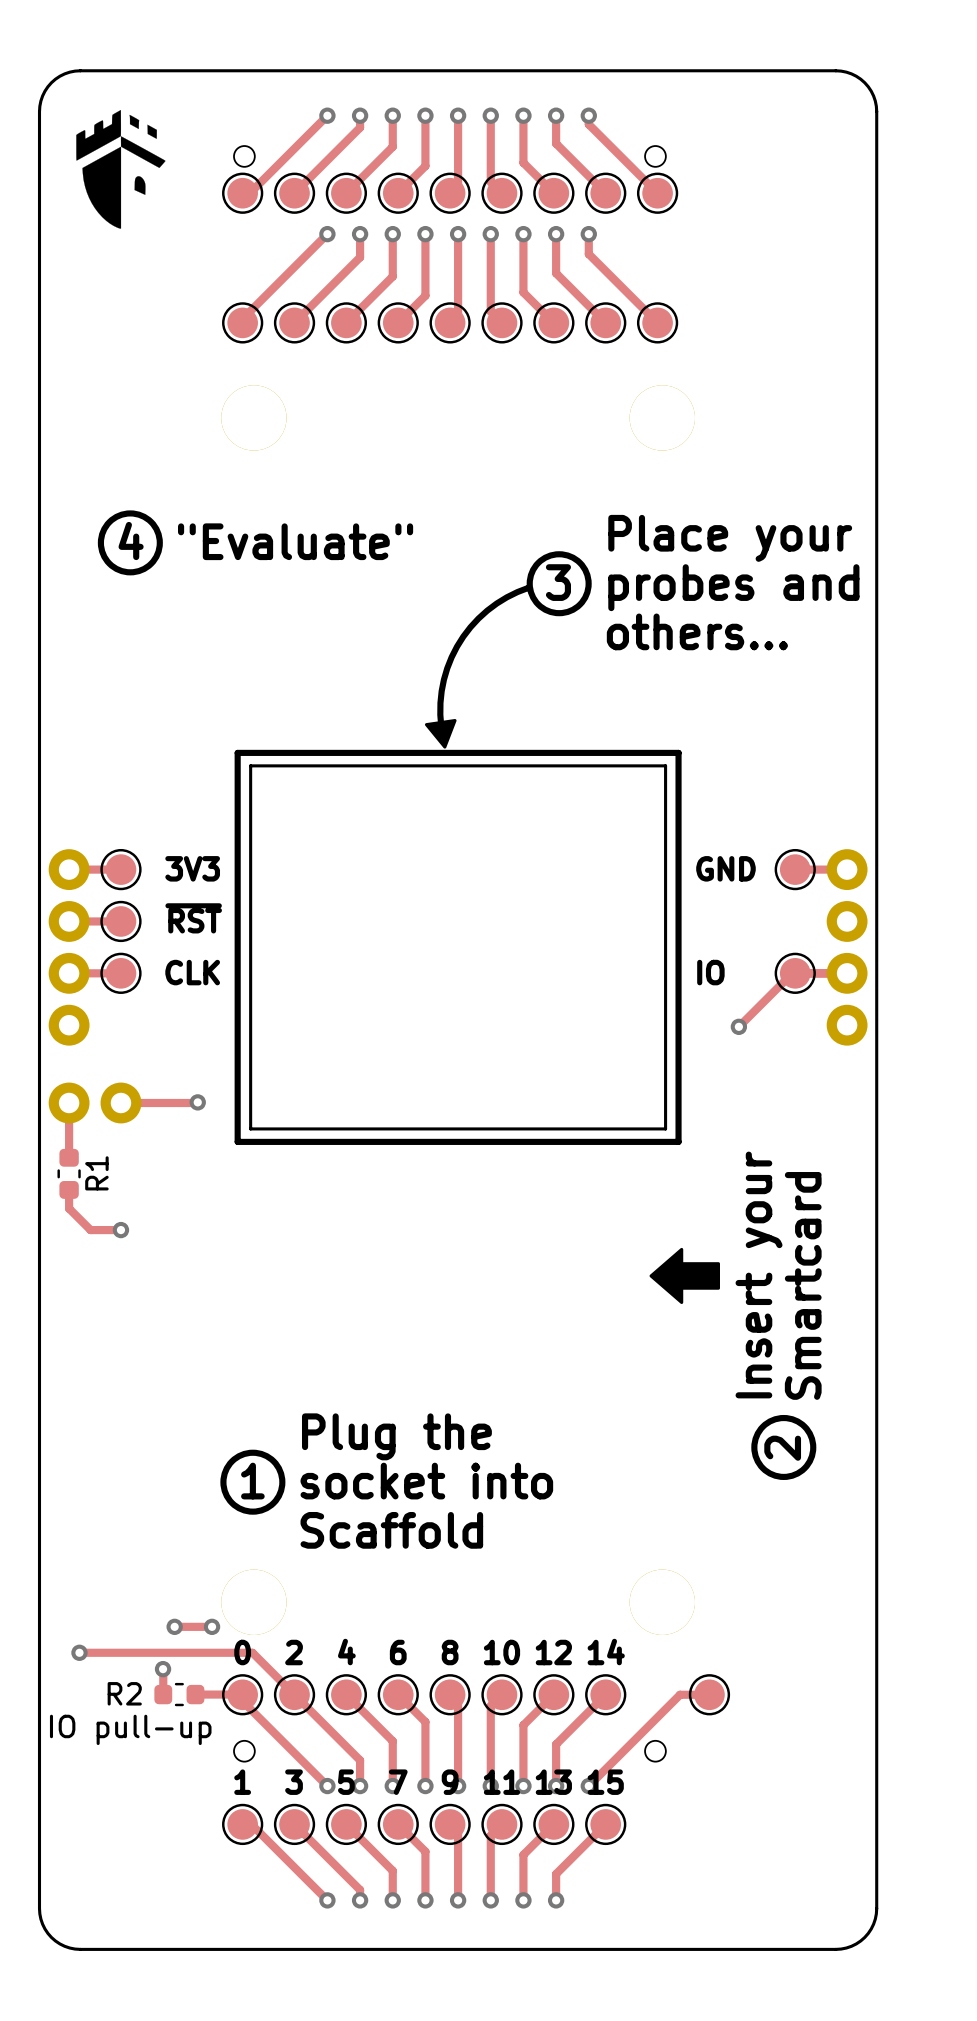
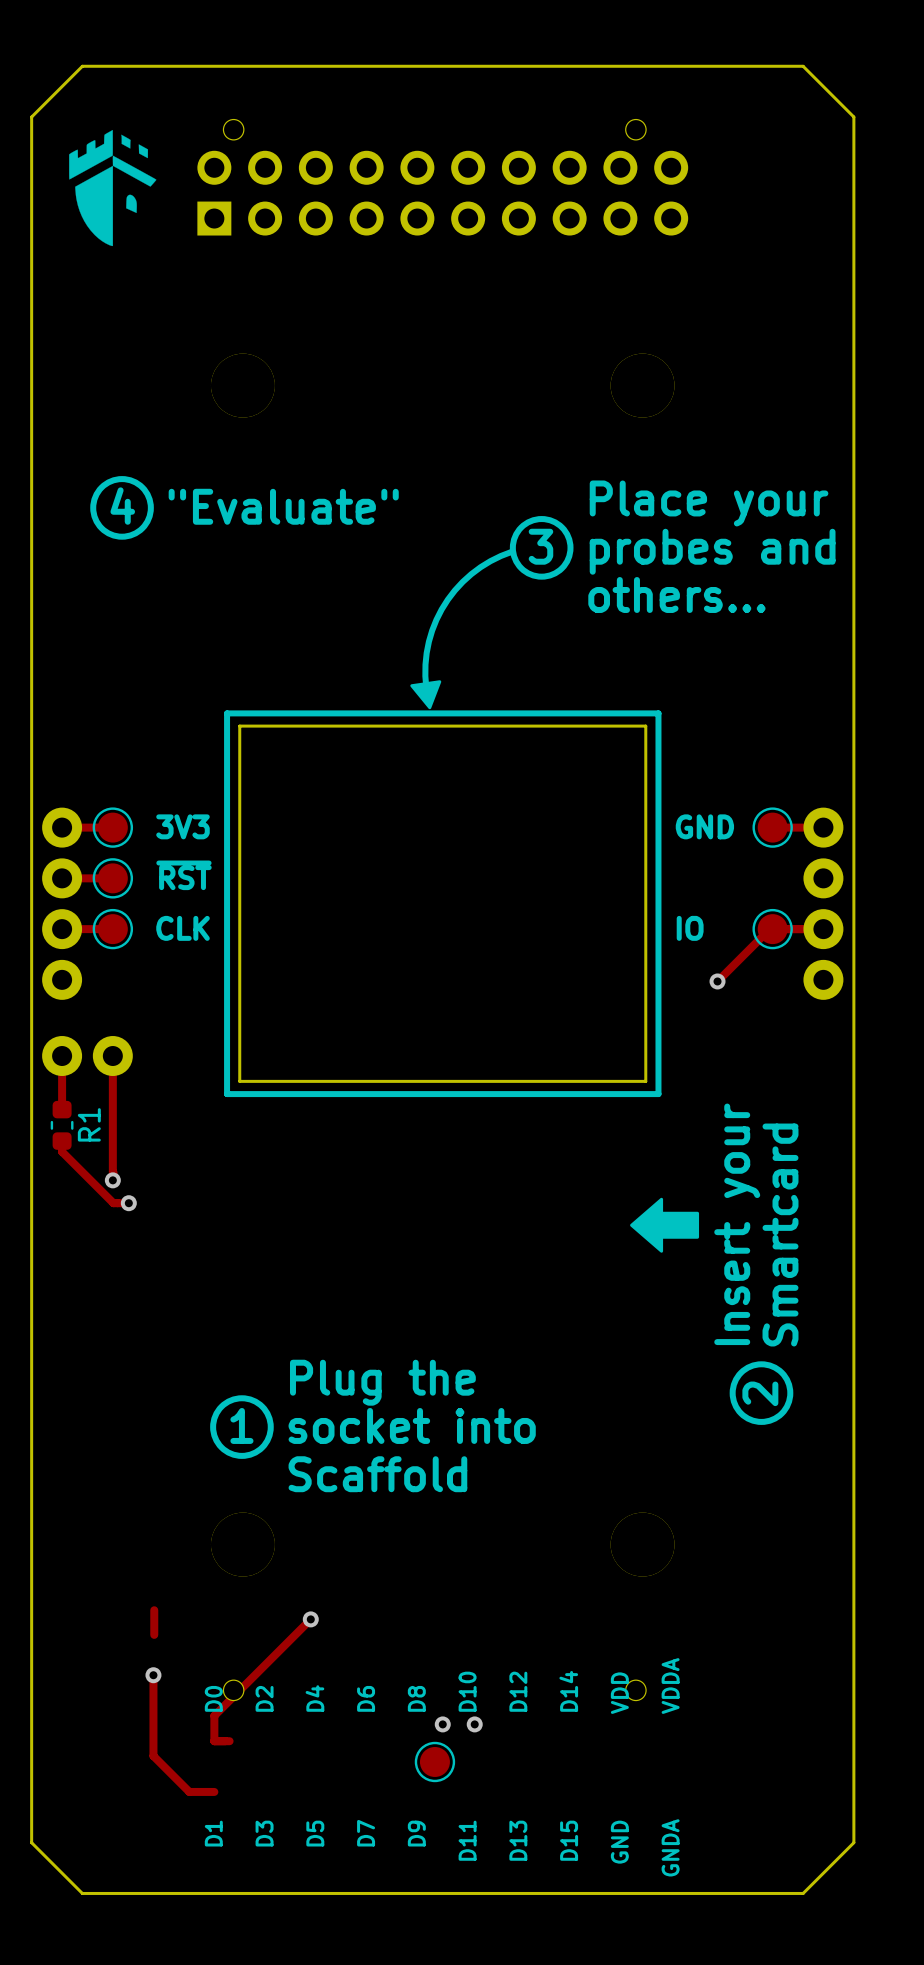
board edge: (80, 70) (835, 70) (846, 72) (860, 79) (873, 95) (876, 111) (876, 1908) (873, 1924) (868, 1933) (851, 1946) (835, 1949) (80, 1949) (64, 1946) (55, 1940) (42, 1924) (39, 1908) (39, 111) (42, 95) (51, 82) (64, 73) (80, 70) -> (82, 66) (31, 117) (31, 1842) (82, 1893) (803, 1893) (853, 1842) (853, 117) (803, 66) (82, 66)
track: (327, 115) (249, 193) (242, 193) -> none
via: (327, 115) -> none
track: (360, 115) (360, 127) (294, 193) -> none
via: (360, 115) -> none
track: (392, 115) (392, 146) (346, 193) -> none
via: (392, 115) -> none
track: (425, 115) (425, 166) (398, 193) -> none
via: (425, 115) -> none
track: (458, 115) (458, 185) (450, 193) -> none
via: (458, 115) -> none
track: (490, 115) (490, 182) (501, 193) -> none
via: (490, 115) -> none
track: (523, 115) (523, 162) (553, 193) -> none
via: (523, 115) -> none
track: (556, 115) (556, 143) (605, 193) -> none
via: (556, 115) -> none
track: (588, 115) (588, 124) (657, 193) -> none
via: (588, 115) -> none
drawing position: (120, 169) -> (112, 188)
part: (242, 193) -> none
part: (294, 193) -> none
part: (346, 193) -> none
part: (398, 193) -> none
part: (450, 193) -> none
part: (501, 193) -> none
part: (553, 193) -> none
part: (605, 193) -> none
part: (657, 193) -> none
part: none -> (442, 193)
track: (327, 234) (242, 318) (242, 322) -> none
via: (327, 234) -> none
track: (360, 234) (360, 257) (294, 322) -> none
via: (360, 234) -> none
track: (392, 234) (392, 276) (346, 322) -> none
via: (392, 234) -> none
track: (425, 234) (425, 295) (398, 322) -> none
via: (425, 234) -> none
track: (458, 234) (458, 314) (450, 322) -> none
via: (458, 234) -> none
track: (490, 234) (490, 311) (501, 322) -> none
via: (490, 234) -> none
track: (523, 234) (523, 292) (553, 322) -> none
via: (523, 234) -> none
track: (556, 234) (556, 273) (605, 322) -> none
via: (556, 234) -> none
track: (588, 234) (588, 254) (657, 322) -> none
via: (588, 234) -> none
part: (242, 322) -> none
part: (294, 322) -> none
part: (346, 322) -> none
part: (398, 322) -> none
part: (450, 322) -> none
part: (501, 322) -> none
part: (553, 322) -> none
part: (605, 322) -> none
part: (657, 322) -> none
track: (197, 1102) (120, 1103) -> (113, 1172) (112, 1056)
via: (197, 1102) -> none
track: (69, 1200) (69, 1208) (90, 1230) (120, 1230) -> (62, 1151) (113, 1203) (128, 1203)
via: none -> (128, 1203)
track: (174, 1626) (212, 1626) -> none
via: (174, 1626) -> none
via: (212, 1626) -> none
track: (79, 1652) (252, 1652) (360, 1760) (360, 1786) -> none
via: (79, 1652) -> none
text: 0 (242, 1652) -> none
text: 2 (294, 1652) -> none
text: 4 (346, 1652) -> none
text: 6 (398, 1652) -> none
text: 8 (450, 1652) -> none
text: 10 (501, 1652) -> none
text: 12 (553, 1652) -> none
text: 14 (606, 1652) -> none
via: (163, 1669) -> none
track: none -> (310, 1619) (214, 1715) (214, 1741) (229, 1741)
via: none -> (310, 1619)
R2: (179, 1694) -> none
track: (195, 1694) (242, 1694) -> none
track: (242, 1694) (242, 1701) (327, 1786) -> none
part: (242, 1694) -> none
part: (294, 1694) -> none
track: (346, 1694) (392, 1741) (392, 1786) -> none
part: (346, 1694) -> none
track: (398, 1694) (425, 1721) (425, 1786) -> none
part: (398, 1694) -> none
track: (450, 1694) (458, 1702) (458, 1786) -> none
part: (450, 1694) -> none
track: (501, 1694) (490, 1705) (490, 1786) -> none
part: (501, 1694) -> none
track: (553, 1694) (523, 1725) (523, 1786) -> none
part: (553, 1694) -> none
track: (605, 1694) (556, 1744) (556, 1786) -> none
part: (605, 1694) -> none
track: (709, 1694) (680, 1694) (588, 1786) -> none
part: (709, 1694) -> none
text: IO pull-up (130, 1729) -> none
track: none -> (153, 1675) (153, 1756) (189, 1791) (214, 1791)
via: none -> (153, 1675)
text: none -> VDDA (670, 1686)
text: none -> D10 (467, 1691)
text: none -> D12 (518, 1691)
text: none -> D14 (568, 1691)
text: none -> VDD (619, 1693)
text: none -> D0 (213, 1698)
text: none -> D2 (264, 1698)
text: none -> D4 (314, 1698)
text: none -> D6 (366, 1698)
text: none -> D8 (416, 1698)
text: 1 (242, 1782) -> none
text: 3 (294, 1782) -> none
text: 5 (346, 1782) -> none
text: 7 (398, 1782) -> none
text: 9 (450, 1782) -> none
text: 11 (501, 1782) -> none
text: 13 (553, 1782) -> none
text: 15 (605, 1782) -> none
via: (327, 1786) -> none
via: (360, 1786) -> none
via: (392, 1786) -> none
via: (425, 1786) -> none
via: (523, 1786) -> none
via: (556, 1786) -> none
via: (588, 1786) -> none
track: (242, 1824) (251, 1824) (327, 1900) -> none
part: (242, 1824) -> none
track: (294, 1824) (360, 1890) (360, 1900) -> none
part: (294, 1824) -> none
track: (346, 1824) (392, 1870) (392, 1900) -> none
part: (346, 1824) -> none
track: (398, 1824) (425, 1851) (425, 1900) -> none
part: (398, 1824) -> none
track: (450, 1824) (458, 1832) (458, 1900) -> none
track: (501, 1824) (490, 1835) (490, 1900) -> none
part: (501, 1824) -> none
track: (553, 1824) (523, 1854) (523, 1900) -> none
part: (553, 1824) -> none
track: (605, 1824) (556, 1874) (556, 1900) -> none
part: (605, 1824) -> none
text: none -> D1 (213, 1833)
text: none -> D3 (264, 1833)
text: none -> D5 (315, 1833)
text: none -> D7 (366, 1833)
text: none -> D9 (416, 1833)
via: (327, 1900) -> none
via: (360, 1900) -> none
via: (392, 1900) -> none
via: (425, 1900) -> none
via: (458, 1900) -> none
via: (490, 1900) -> none
via: (523, 1900) -> none
via: (556, 1900) -> none
text: none -> D11 (467, 1840)
text: none -> D13 (518, 1840)
text: none -> D15 (569, 1840)
text: none -> GND (619, 1842)
text: none -> GNDA (670, 1847)

